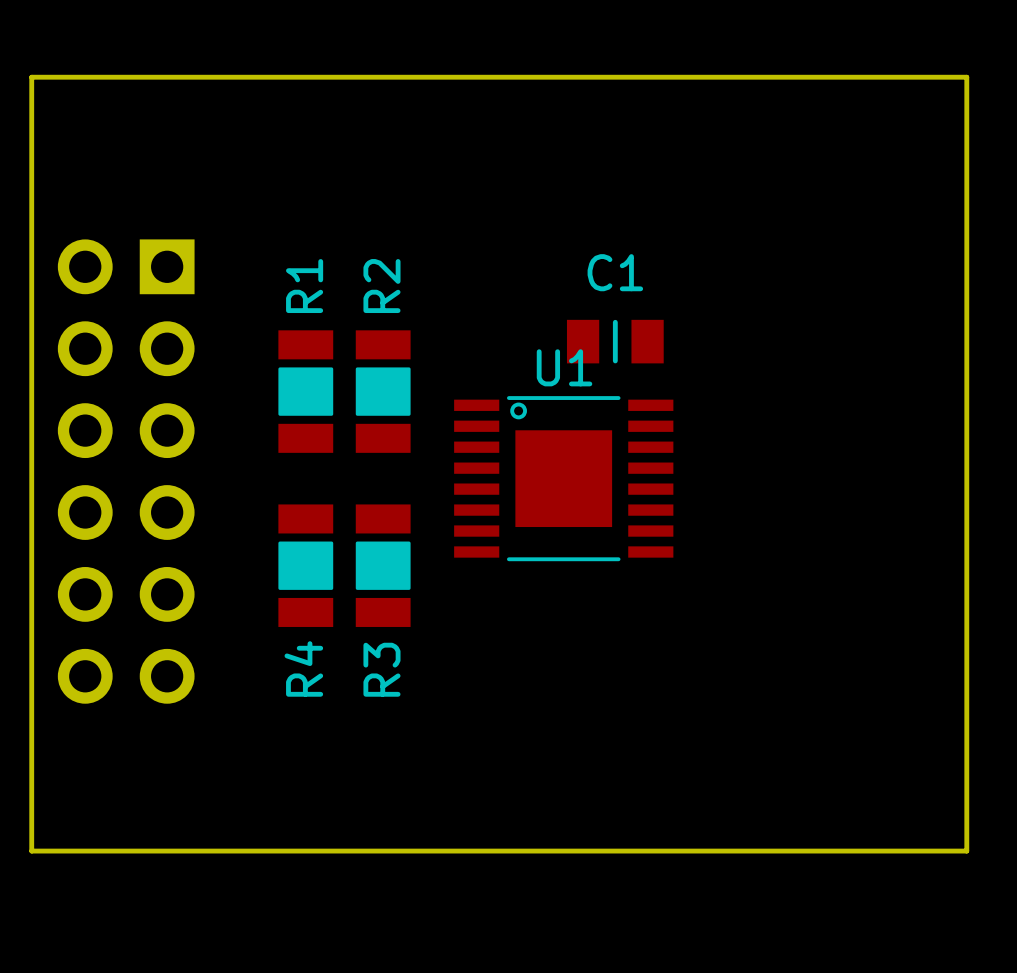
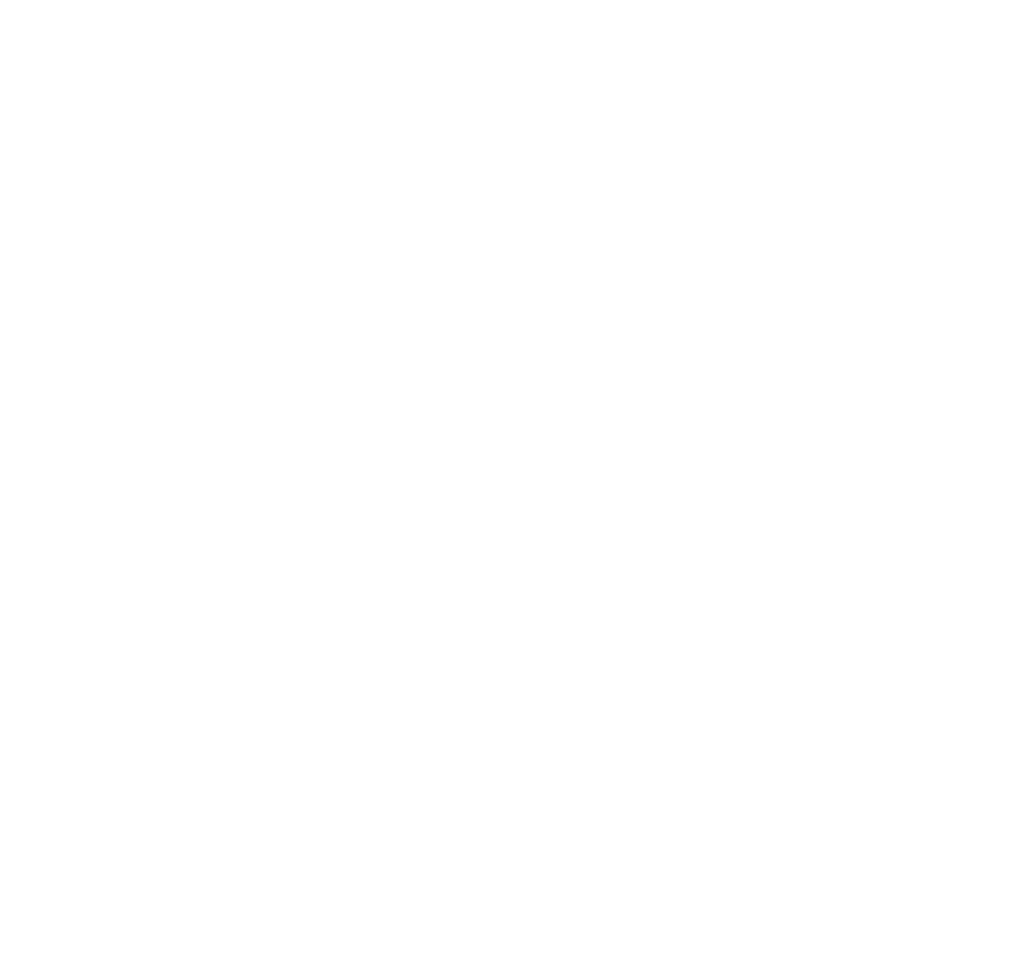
board edge: (31, 77) (966, 77) (966, 851) (31, 851) (31, 77) -> none
C1: (615, 341) -> none
R1: (305, 391) -> none
R2: (383, 391) -> none
part: (126, 471) -> none
U1: (563, 478) -> none
R4: (305, 565) -> none
R3: (383, 565) -> none

